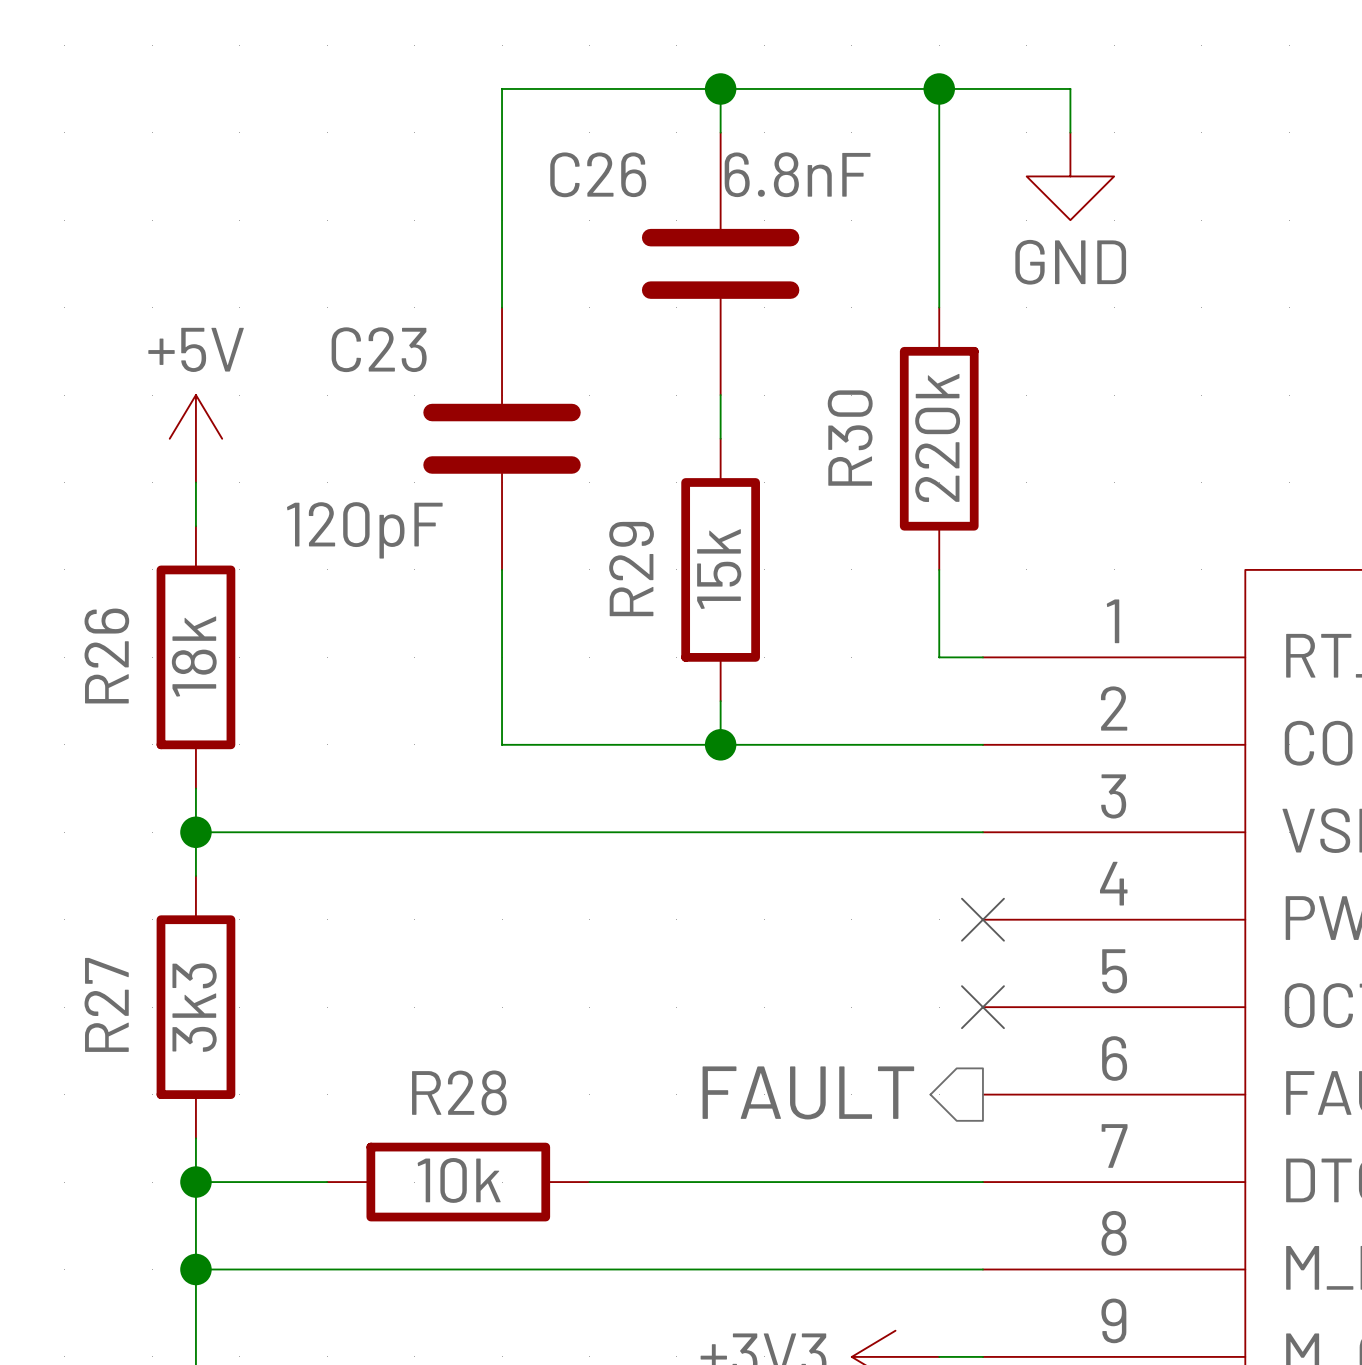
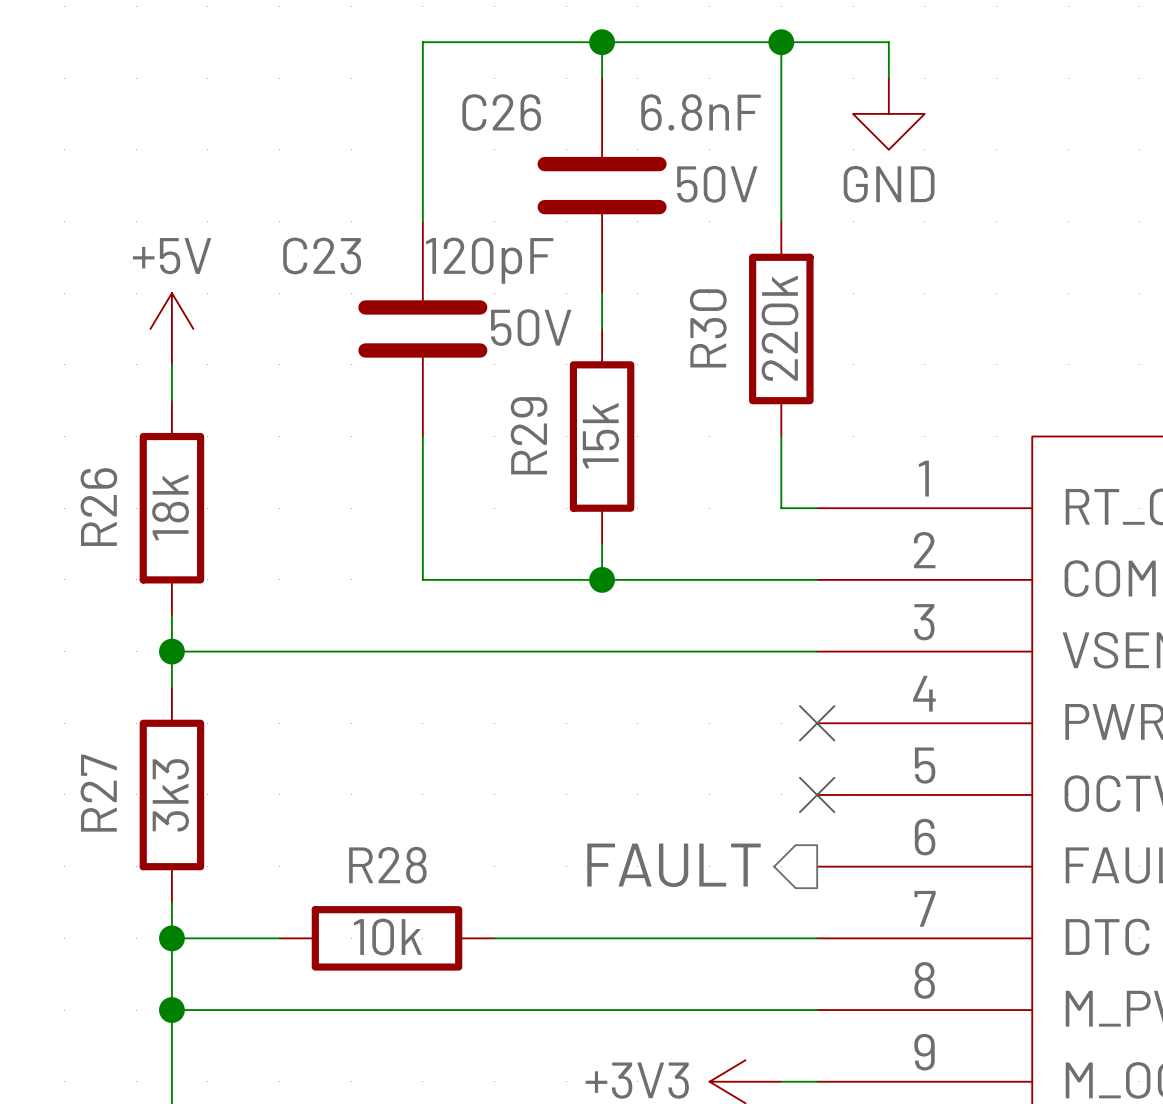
C26 value position: 6.8nF (797, 174) -> 6.8nF (701, 112)
C26 text: none -> 50V (717, 184)
C23 text: none -> 50V (531, 327)
C23 value position: 120pF (364, 530) -> 120pF (489, 260)

